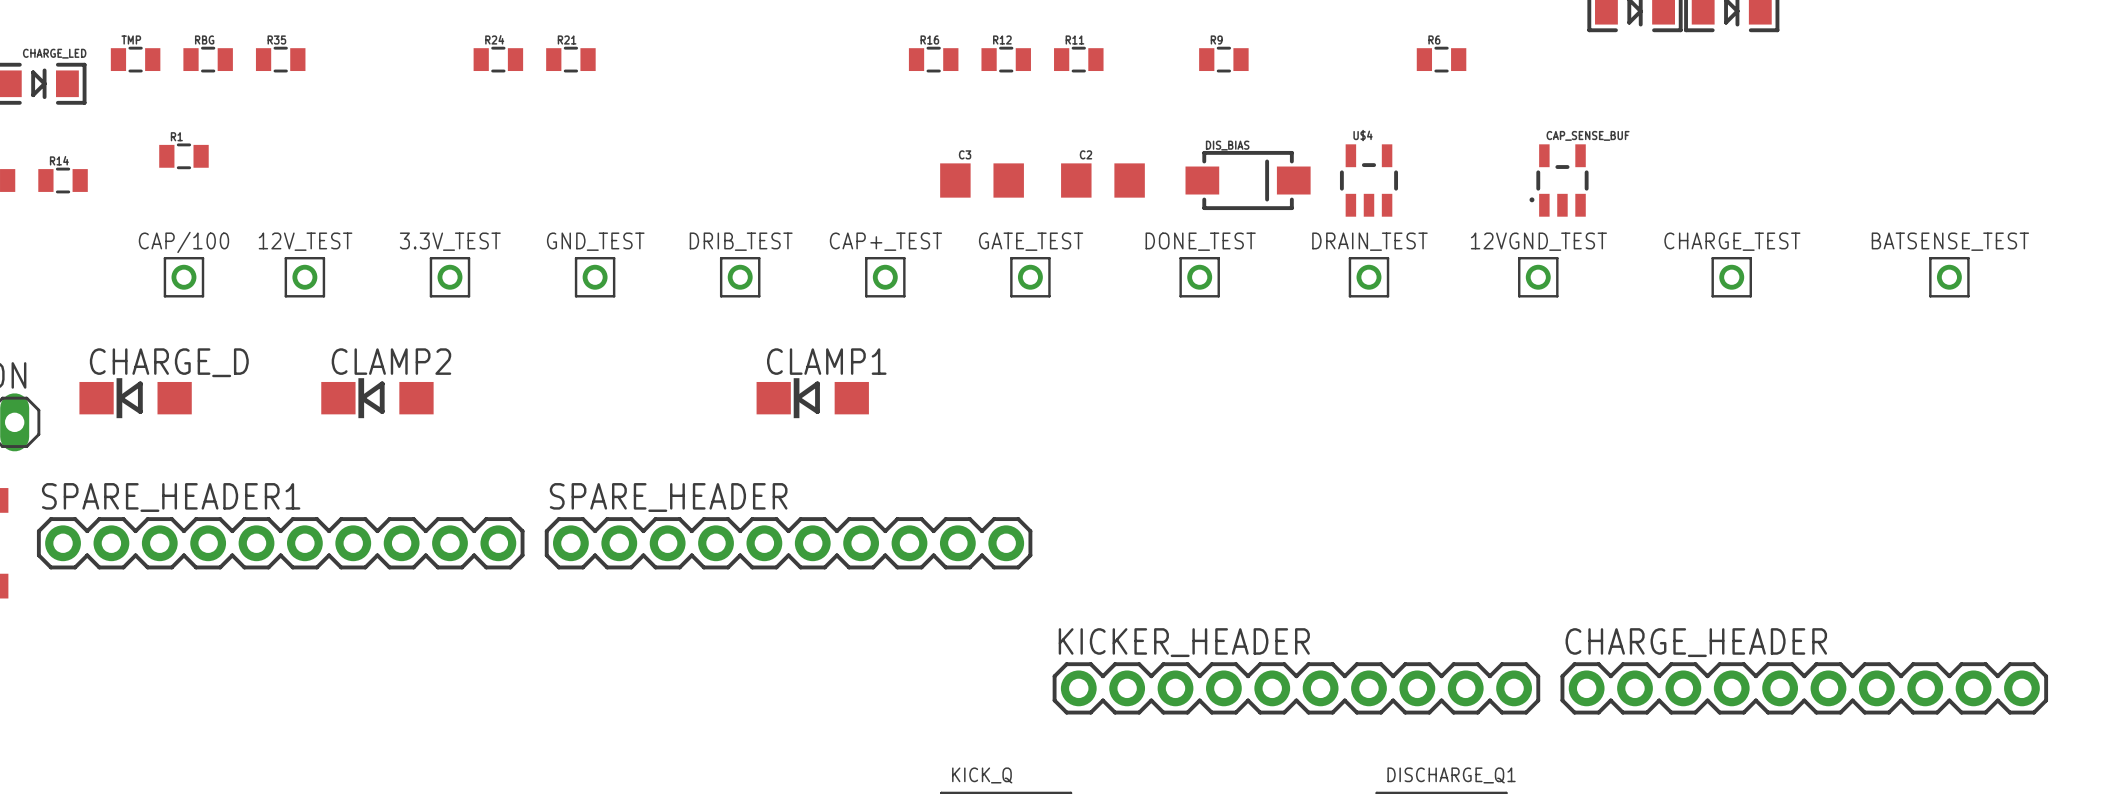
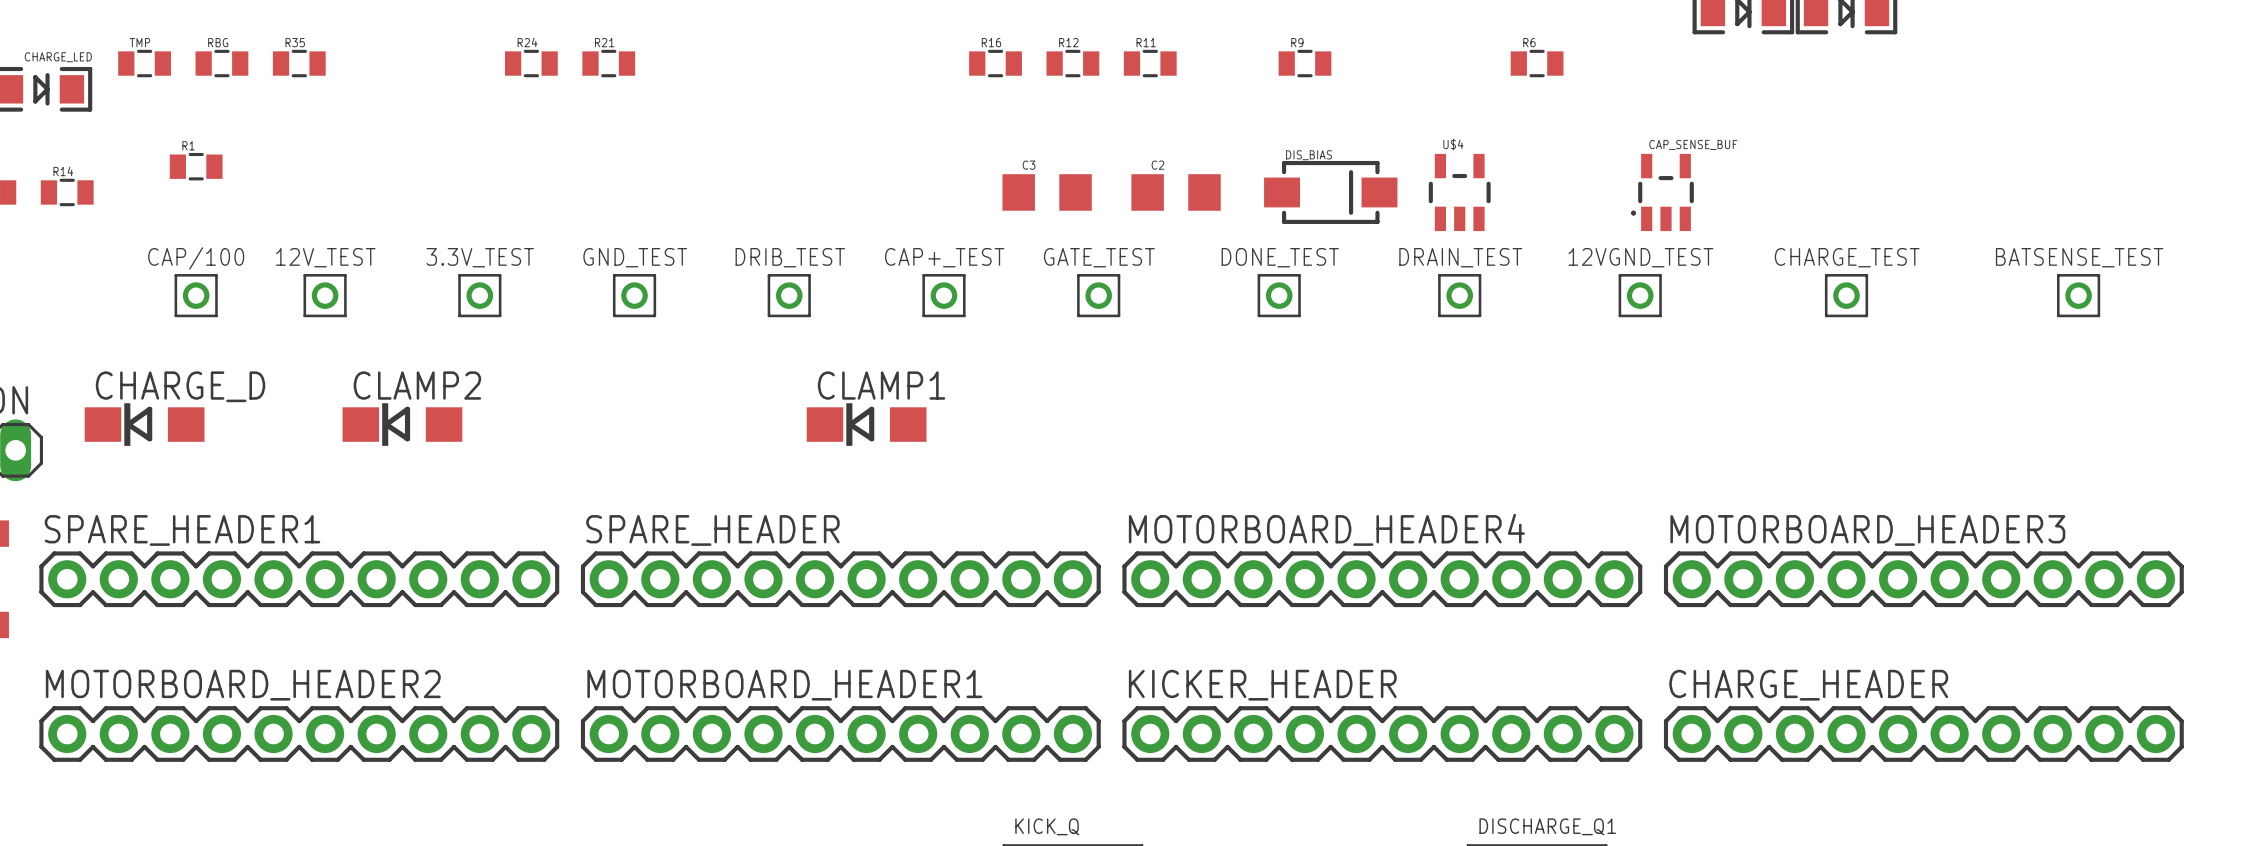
MOTORBOARD_HEADER4: none -> (1382, 579)
MOTORBOARD_HEADER3: none -> (1923, 579)
MOTORBOARD_HEADER2: none -> (299, 733)
MOTORBOARD_HEADER1: none -> (840, 733)

